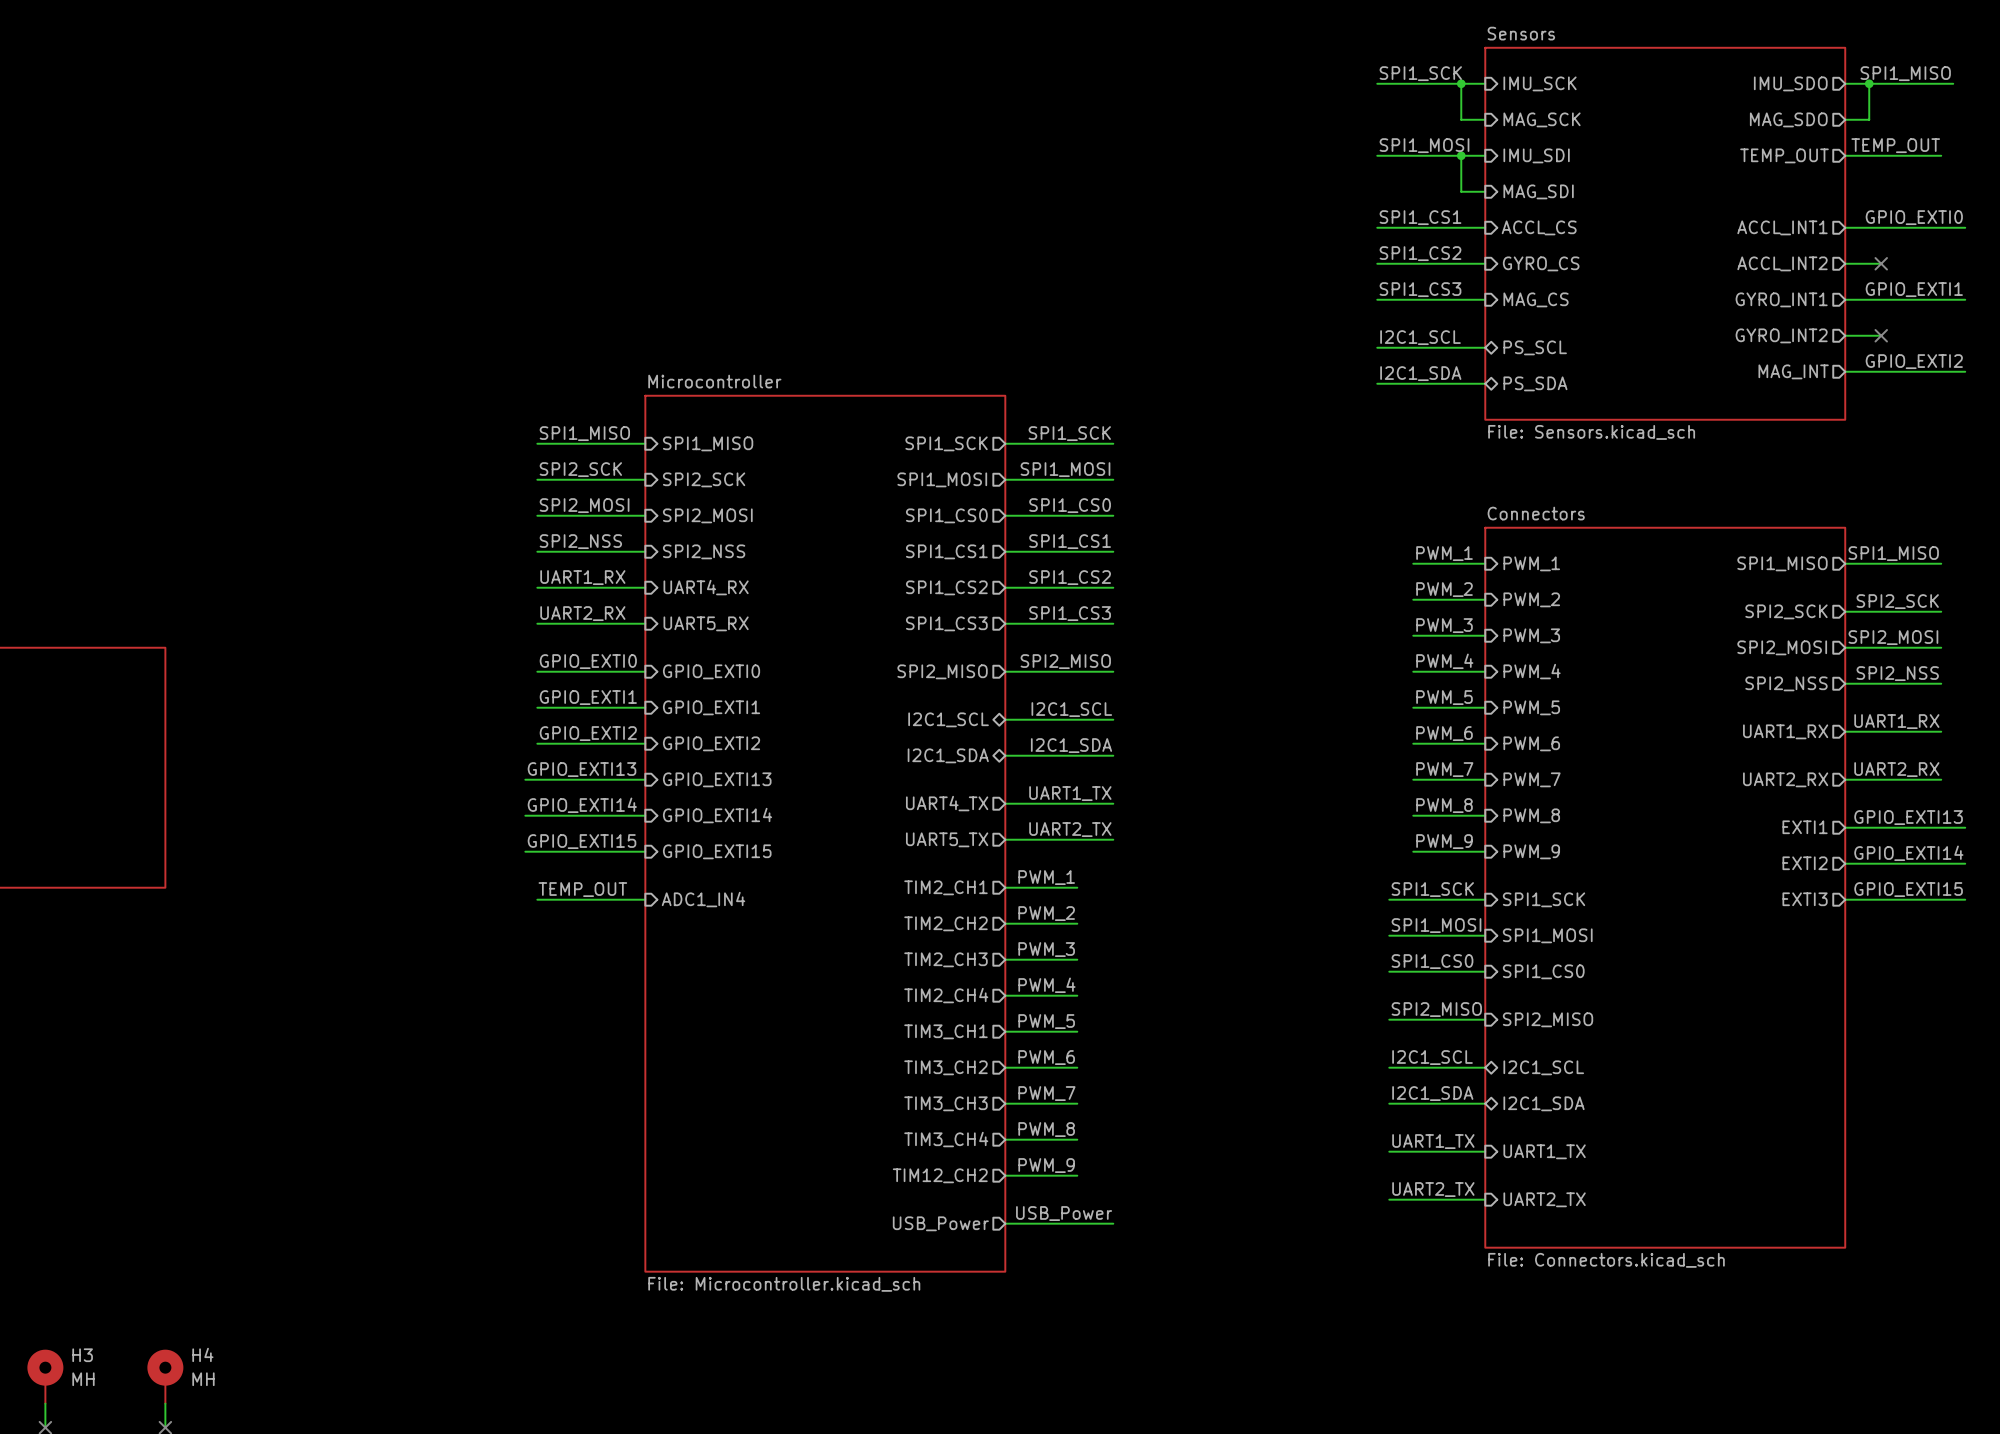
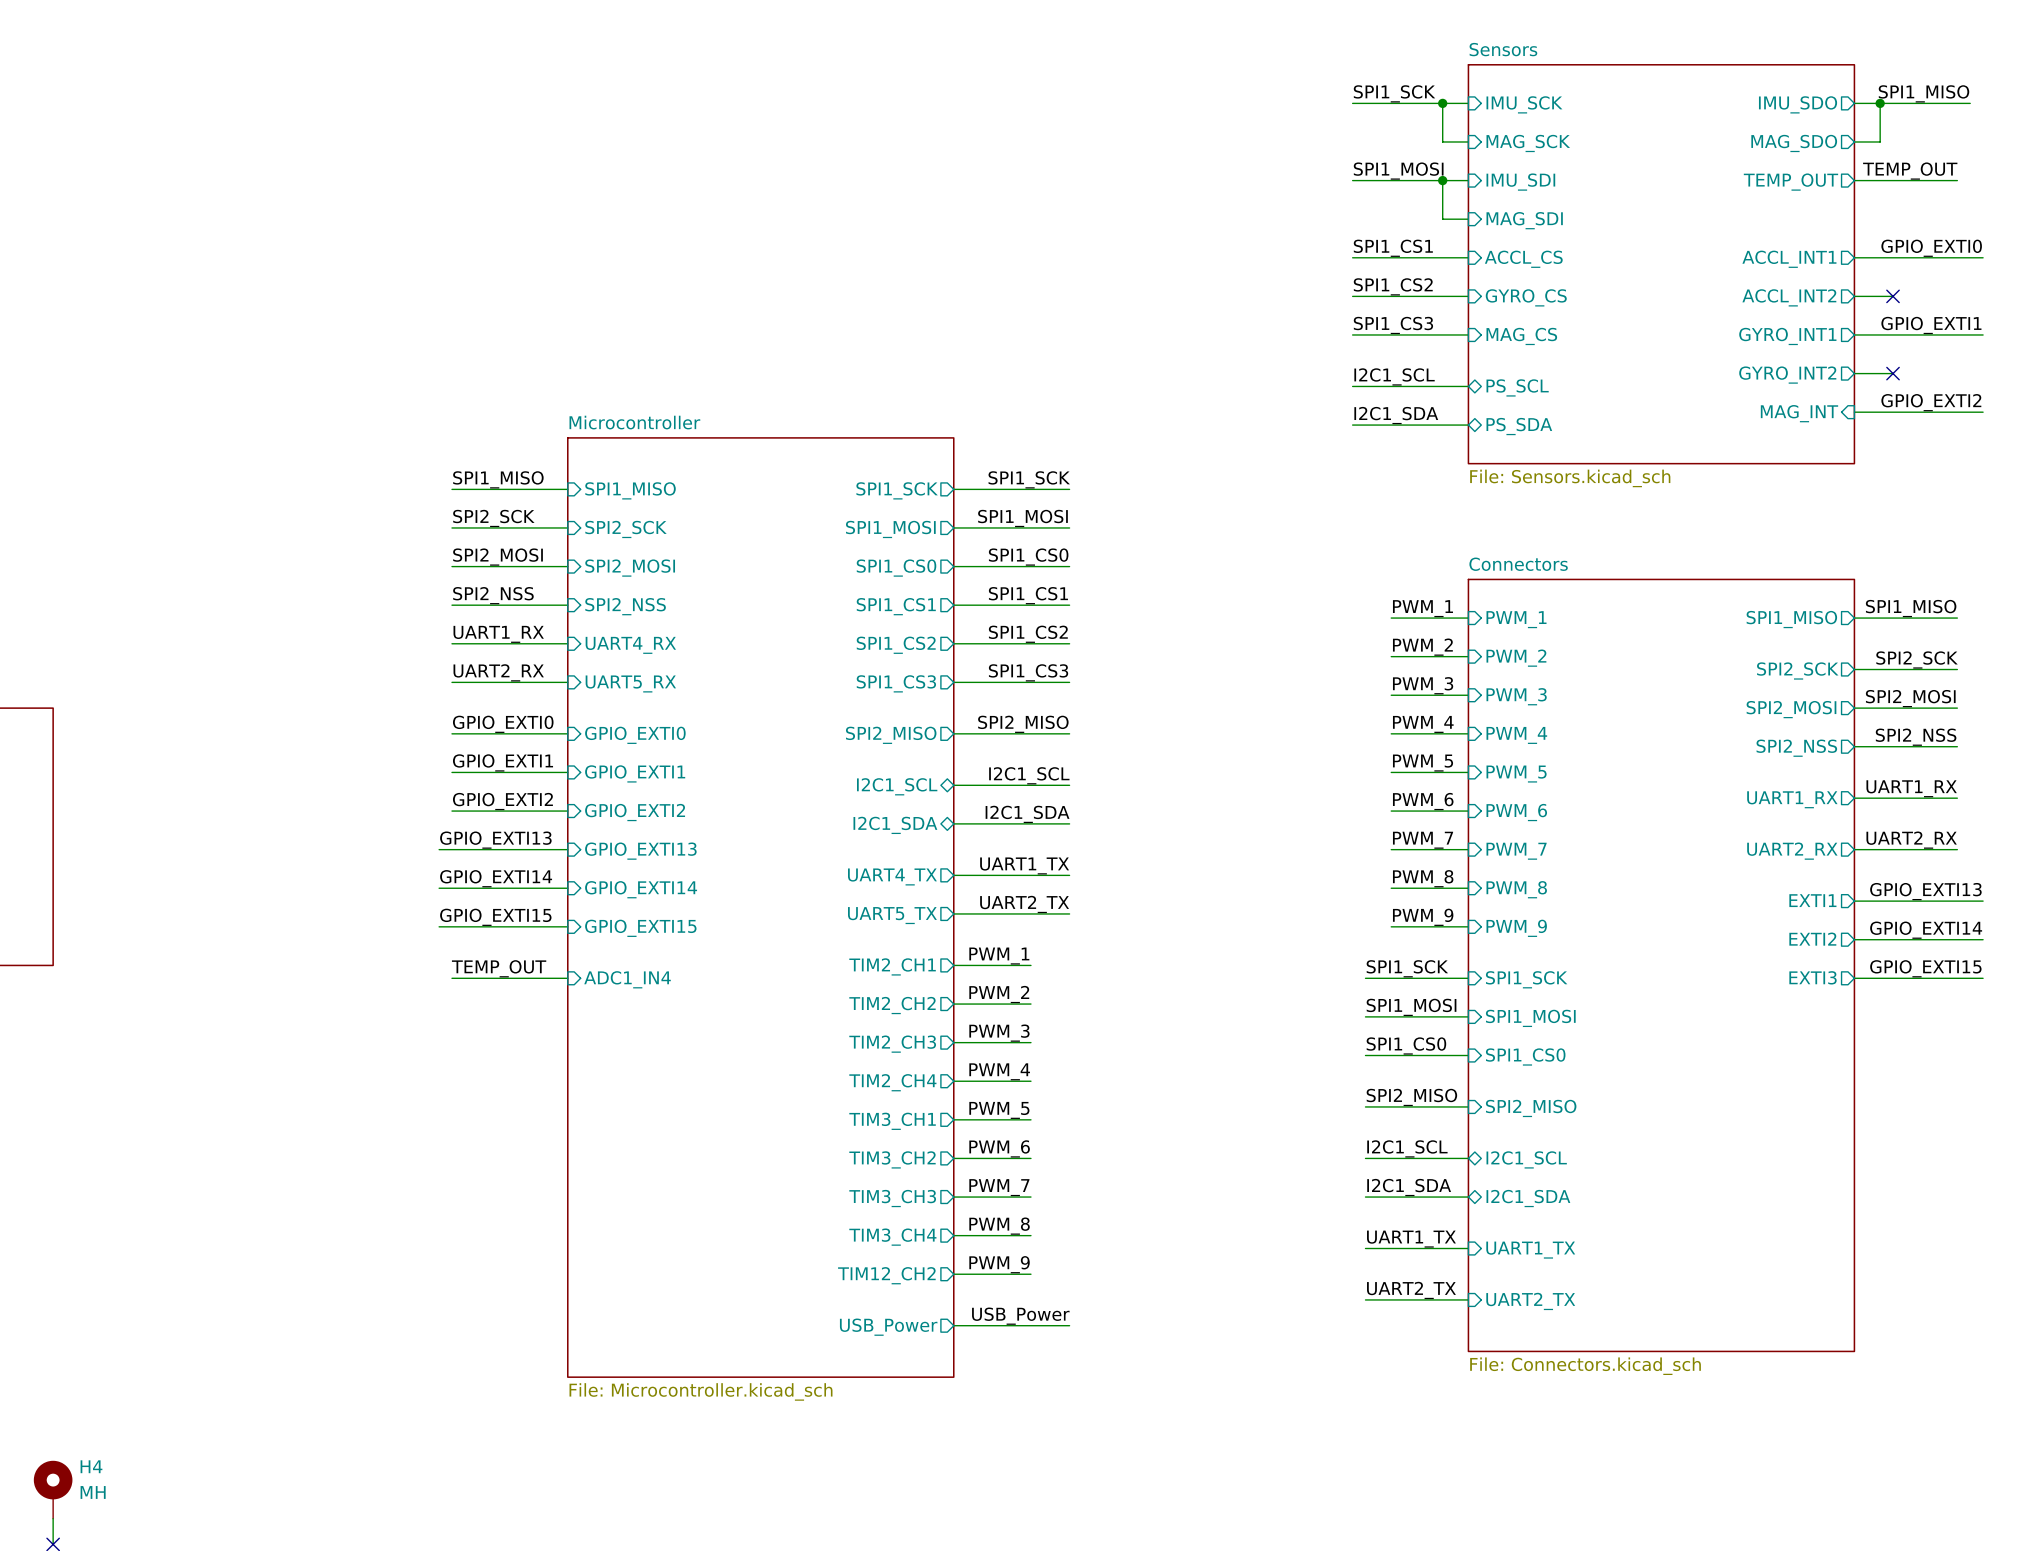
sheet pin shape: output (1793, 371) -> input (1799, 413)

